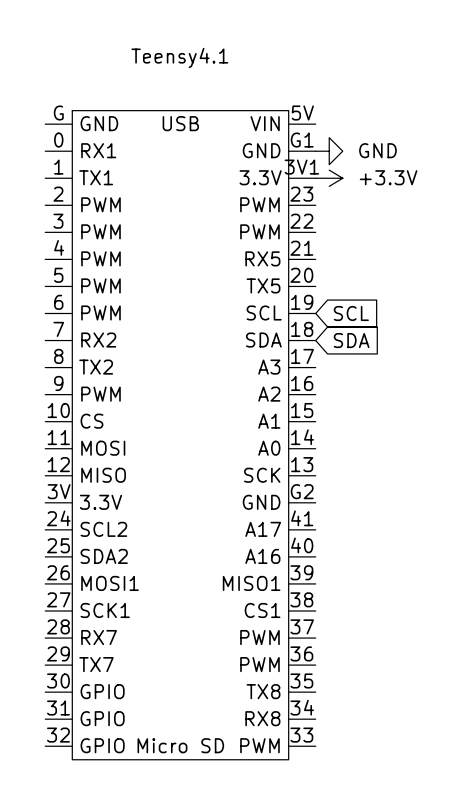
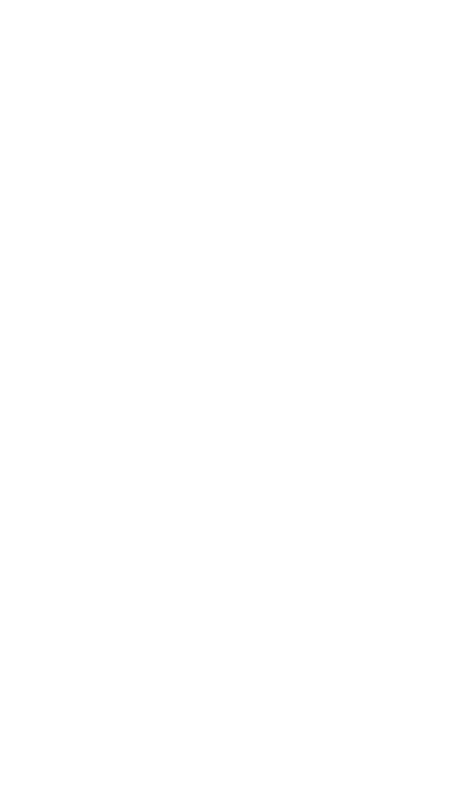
power symbol: GND (329, 151) -> none
power symbol: +3.3V (329, 178) -> none
global label: SCL (351, 313) -> none
global label: SDA (351, 340) -> none
Teensy4.1: (180, 435) -> none

